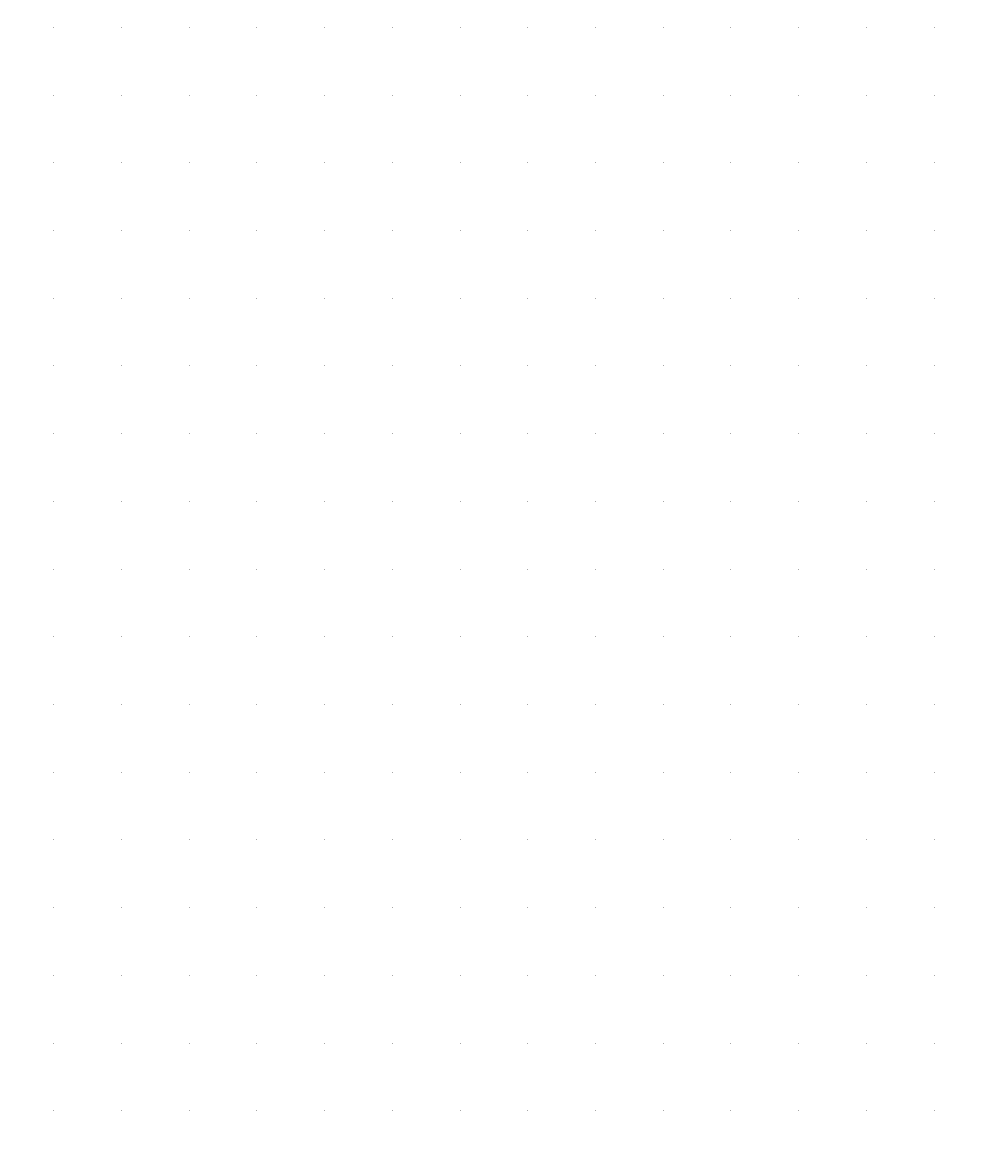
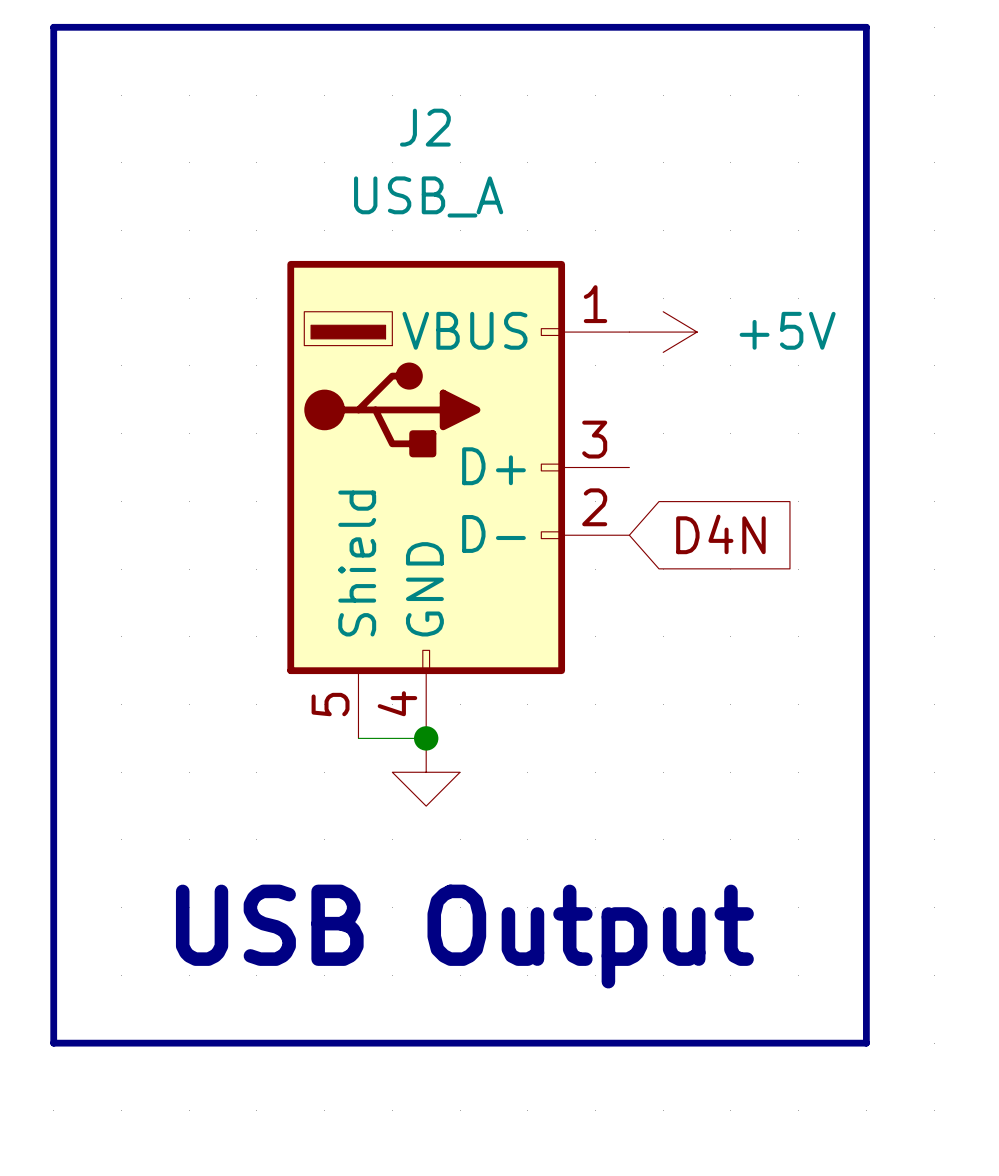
line: none -> (53, 27) (866, 27) (866, 1043) (53, 1043) (53, 27)
power symbol: none -> +5V (663, 332)
J2: none -> USB_A (458, 499)
global label: none -> D4N (720, 534)
wire: none -> (358, 738) (426, 738)
junction: none -> (426, 738)
power symbol: none -> (426, 772)
text: none -> USB Output (464, 936)

